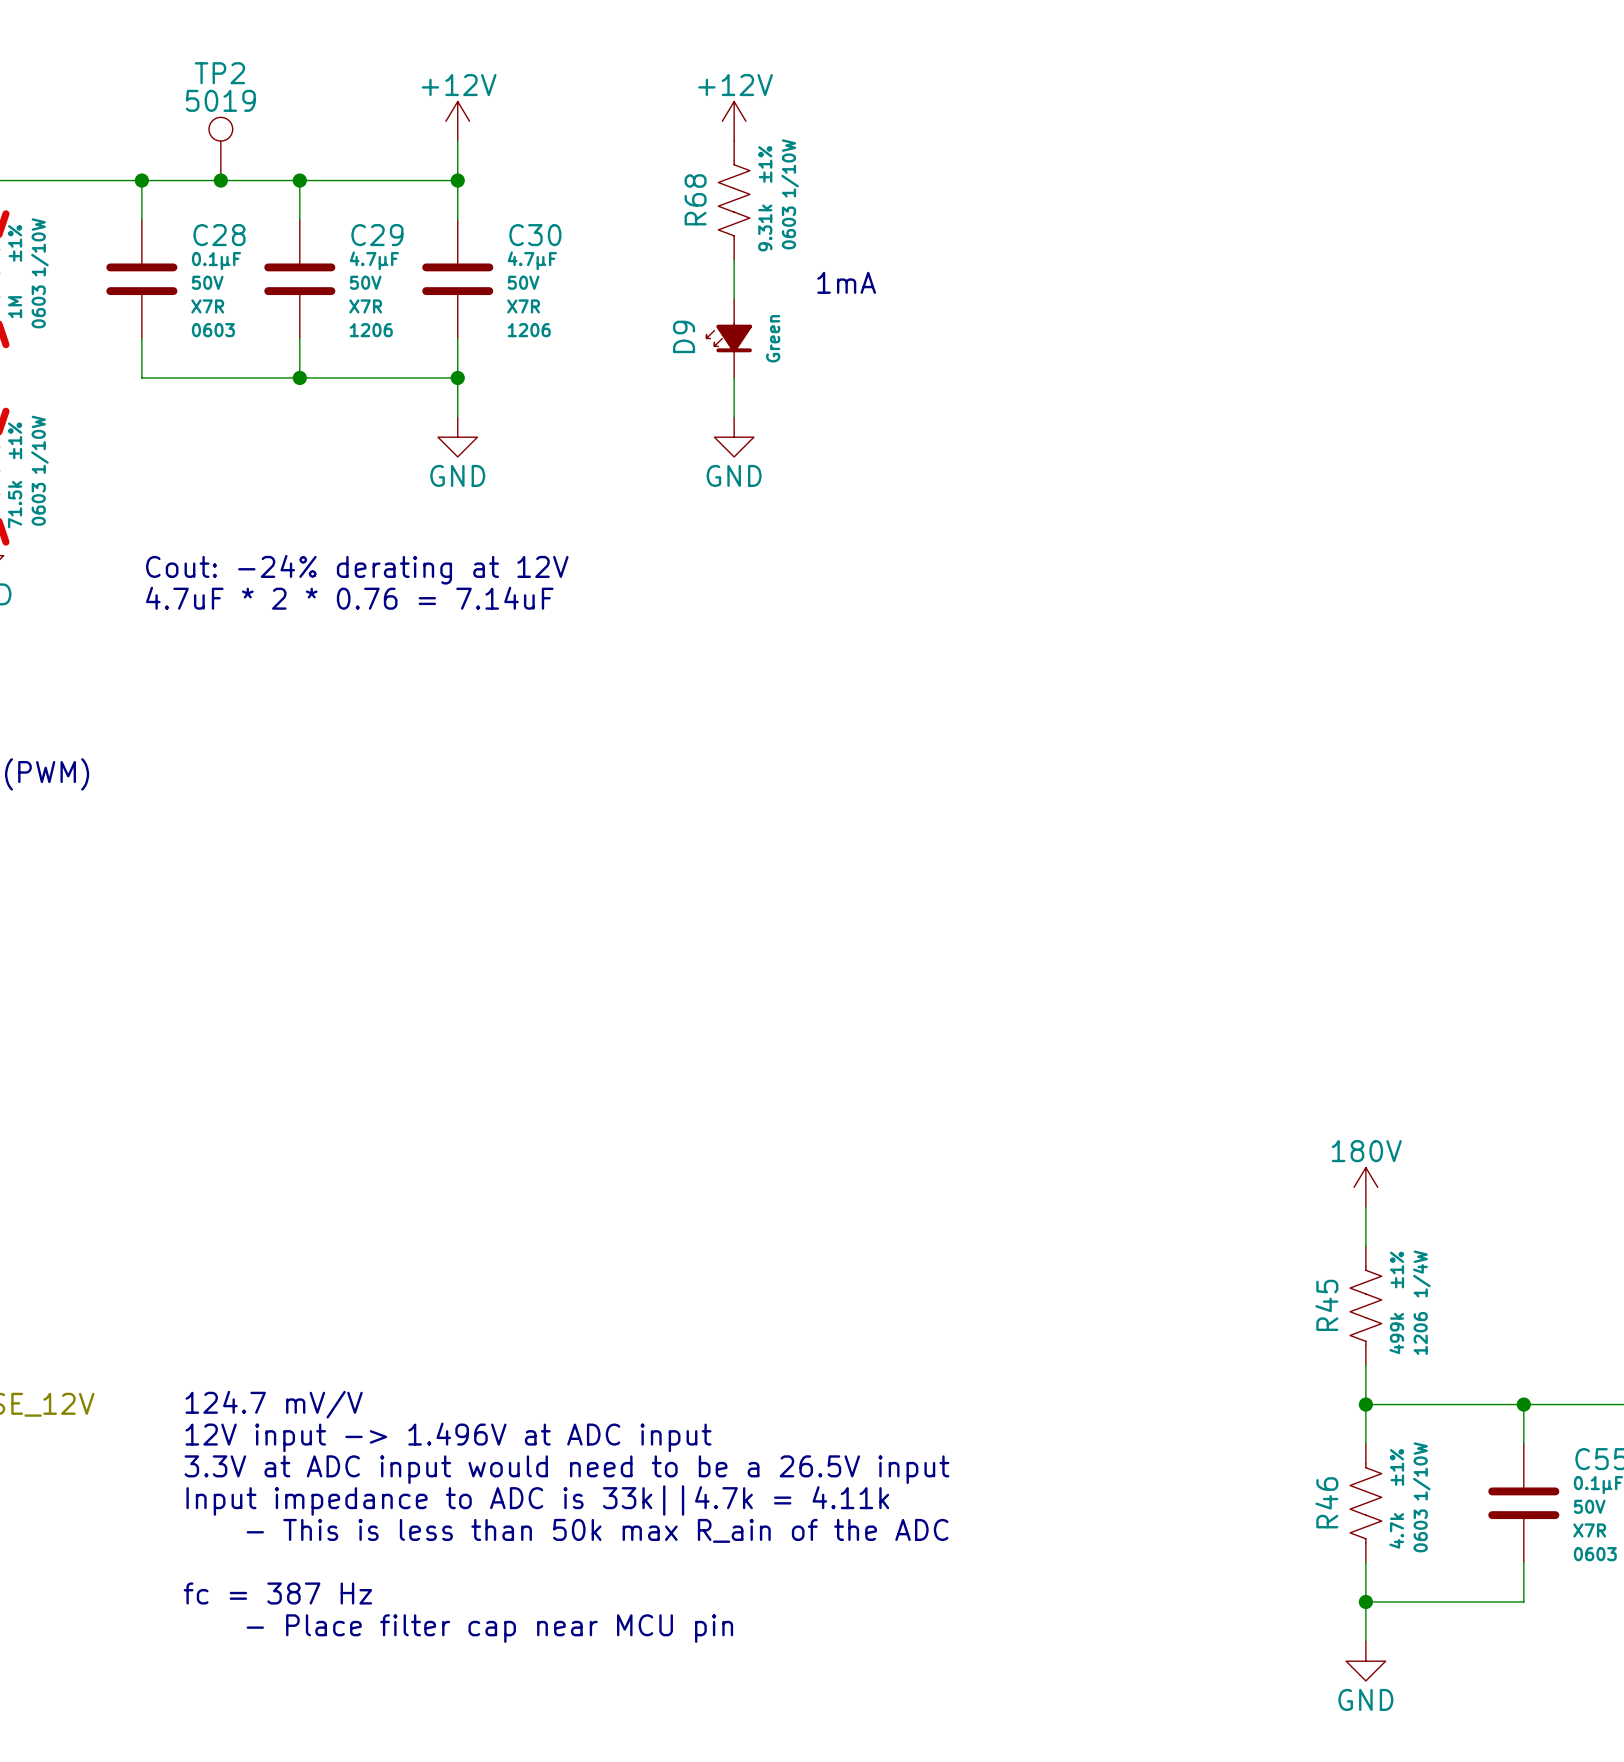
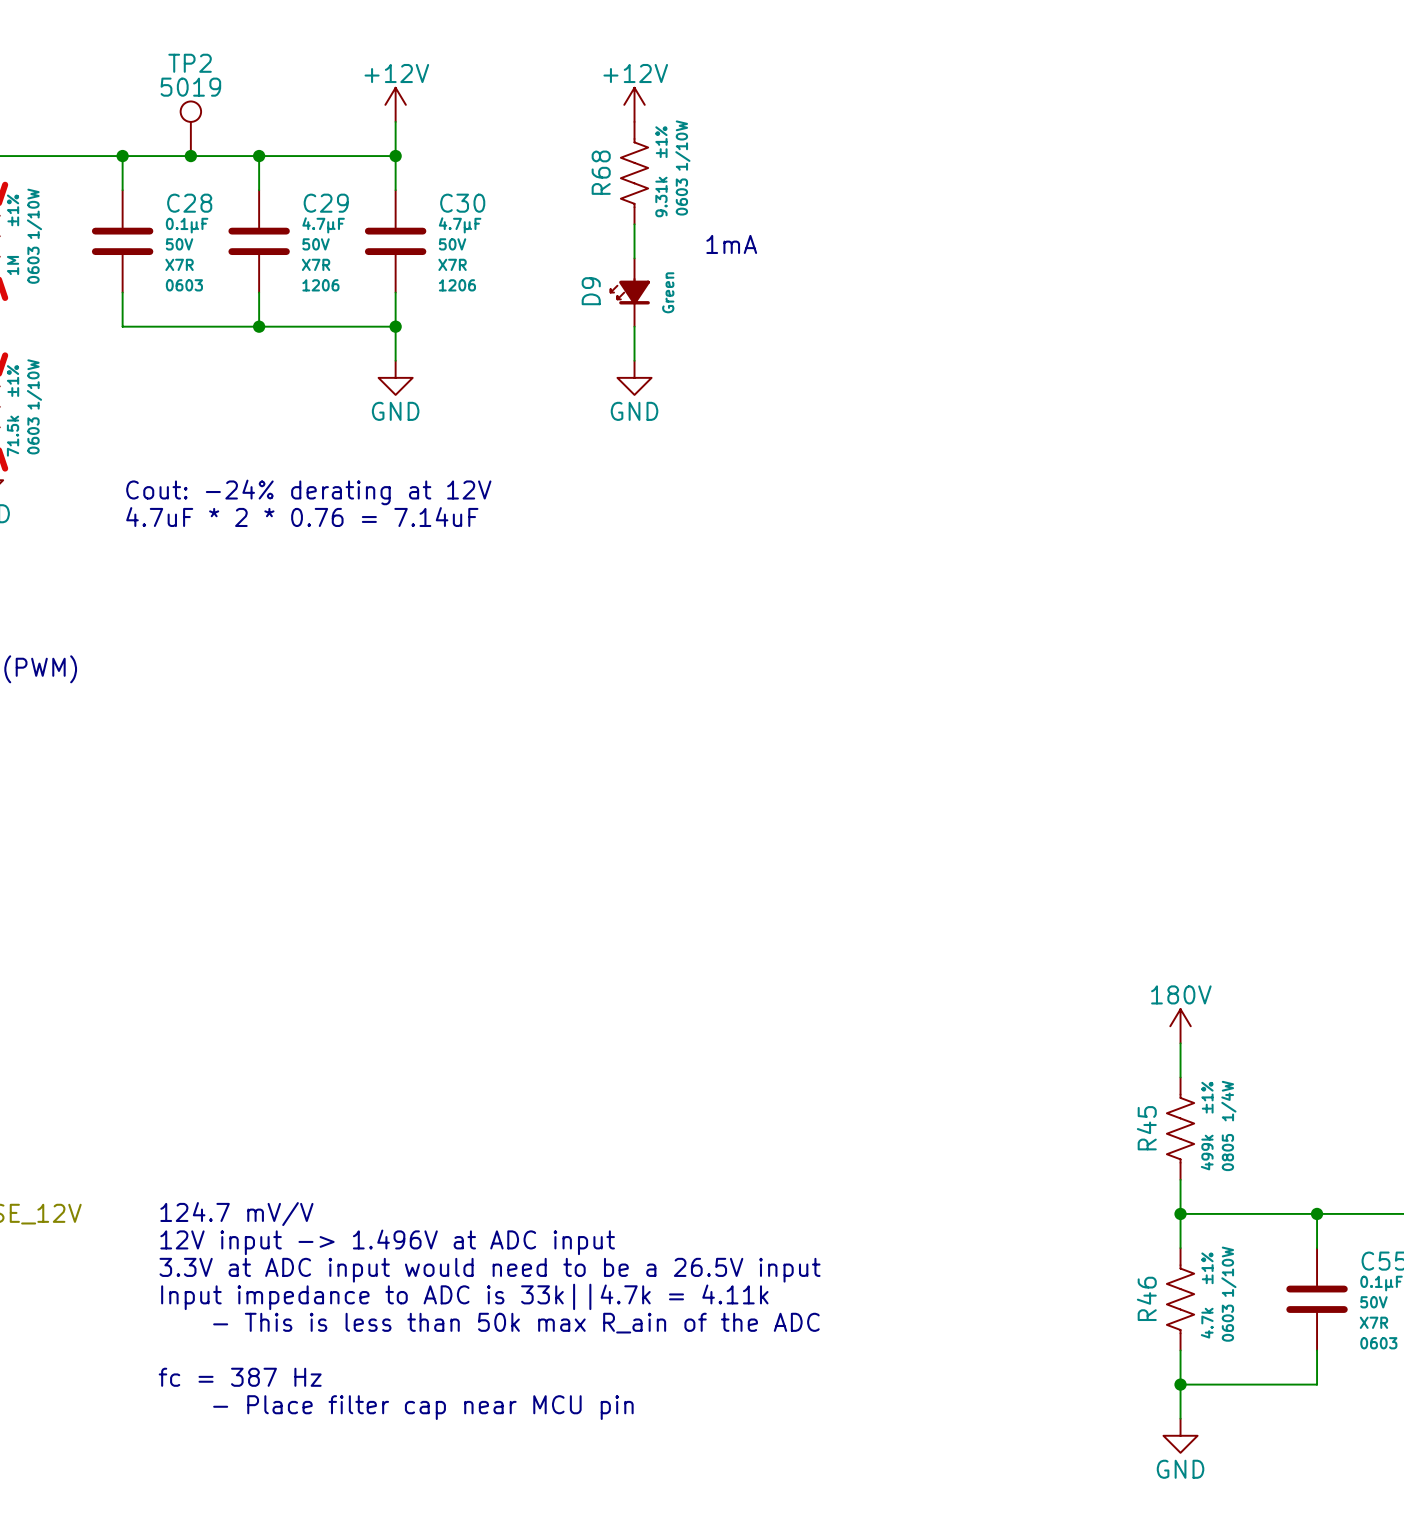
R45 text: 1206 (1420, 1333) -> 0805 (1227, 1152)

